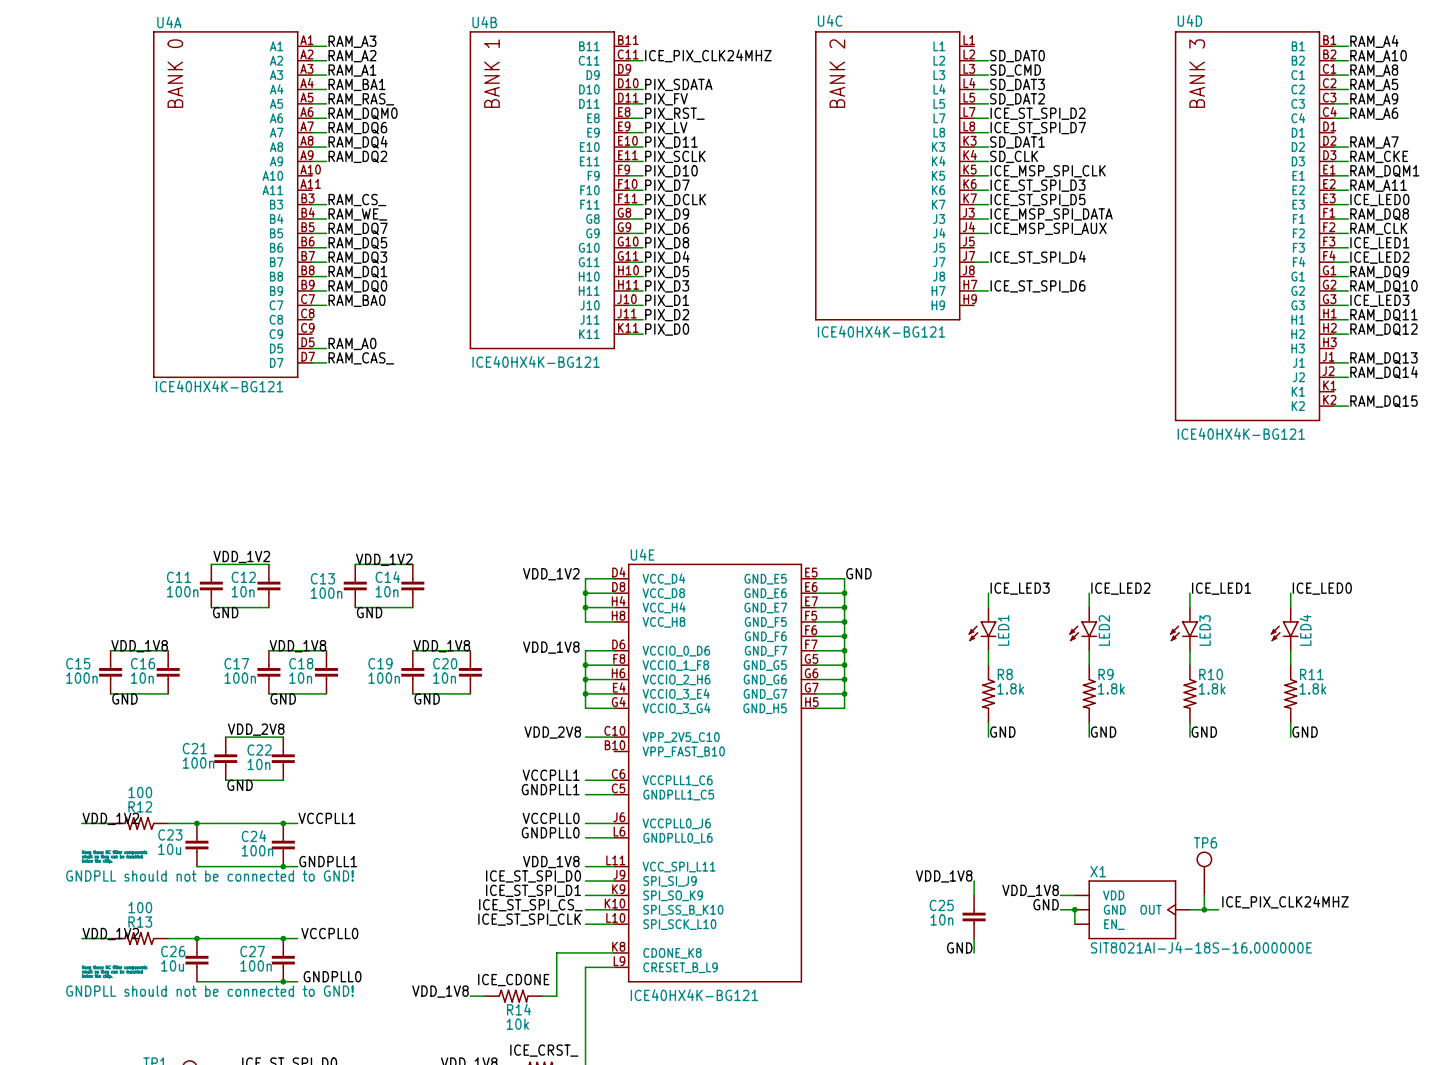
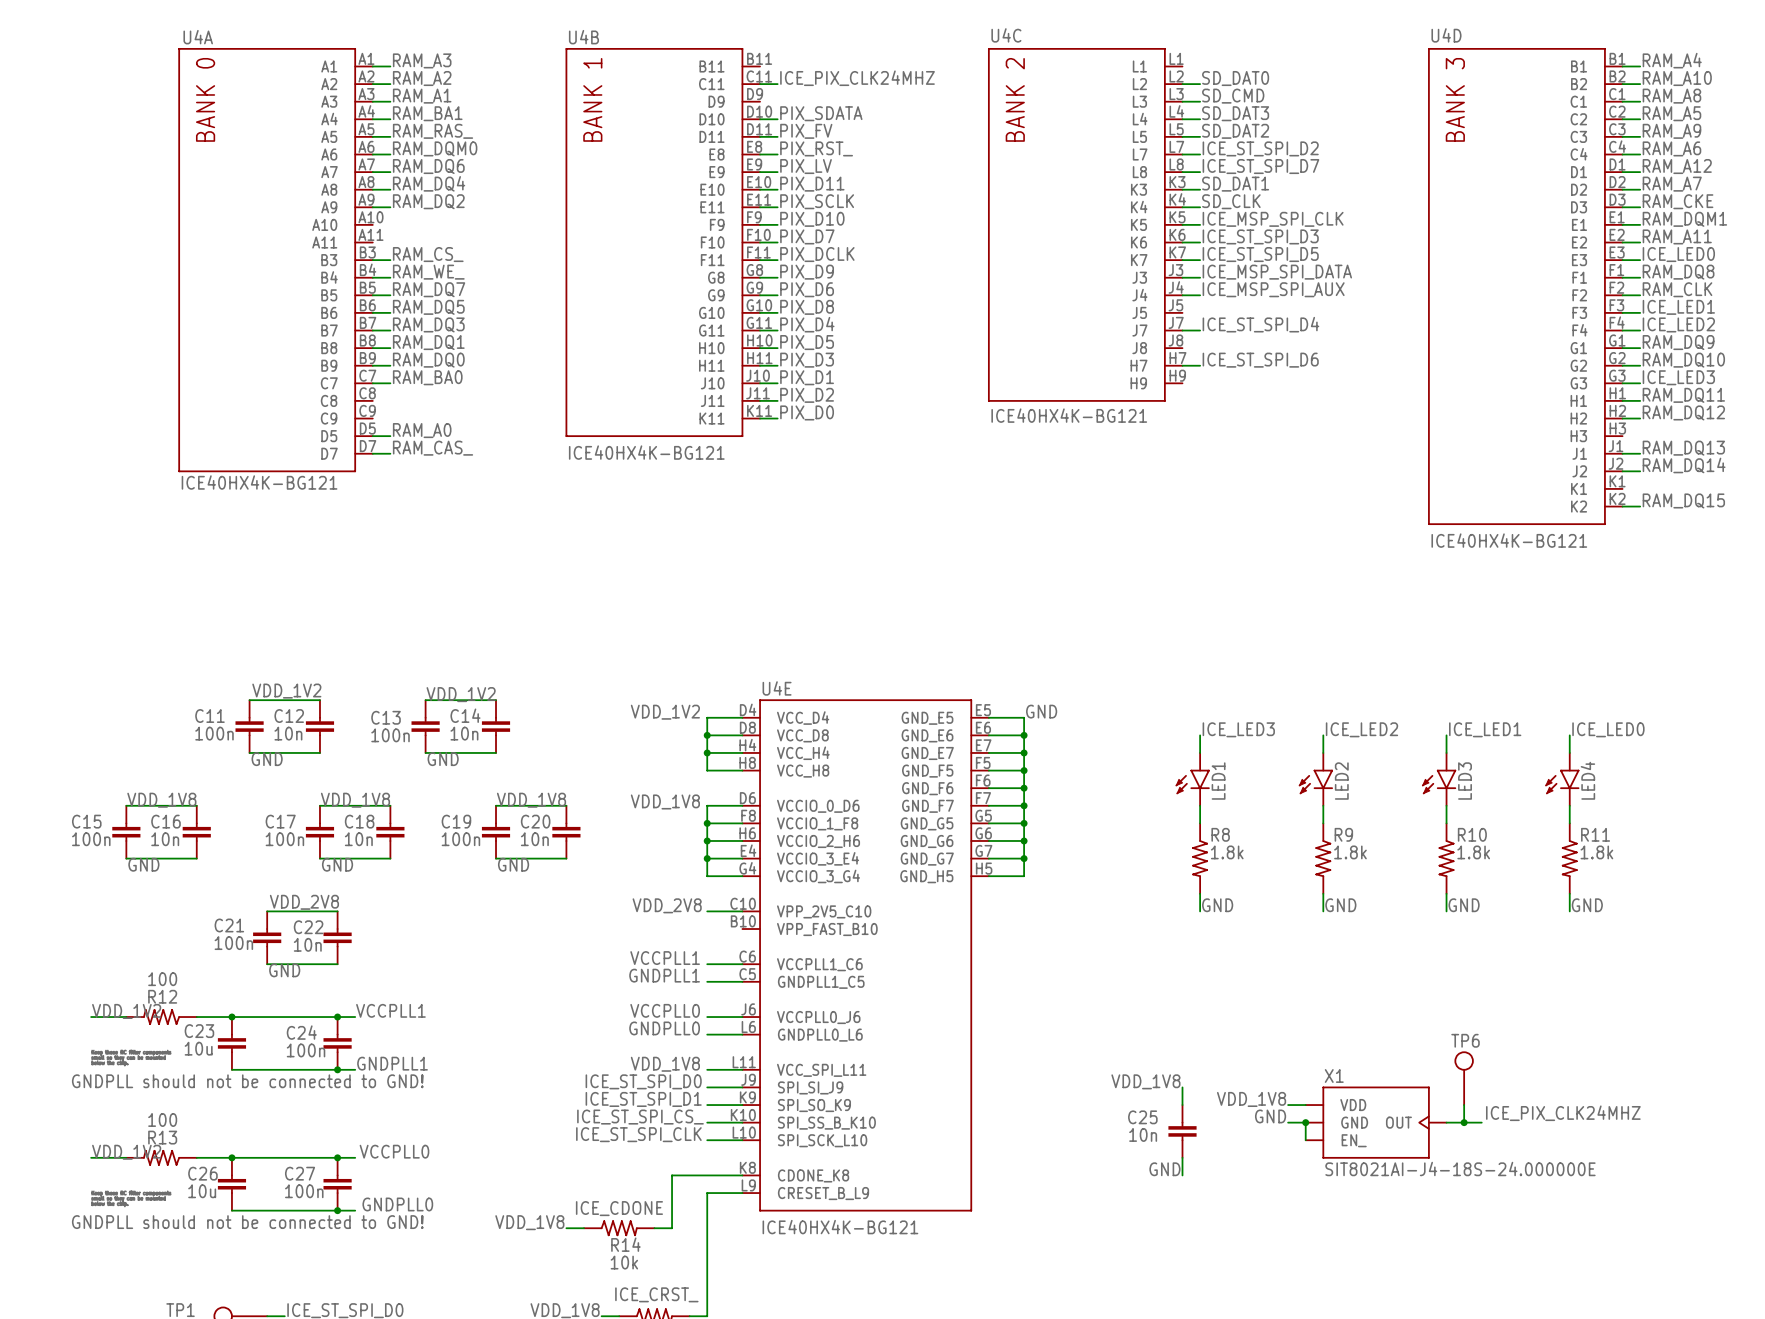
label: none -> RAM_A12 (1677, 166)
wire: none -> (1622, 172) (1640, 172)
X1 text: SIT8021AI-J4-18S-16.000000E (1201, 947) -> SIT8021AI-J4-18S-24.000000E (1460, 1168)

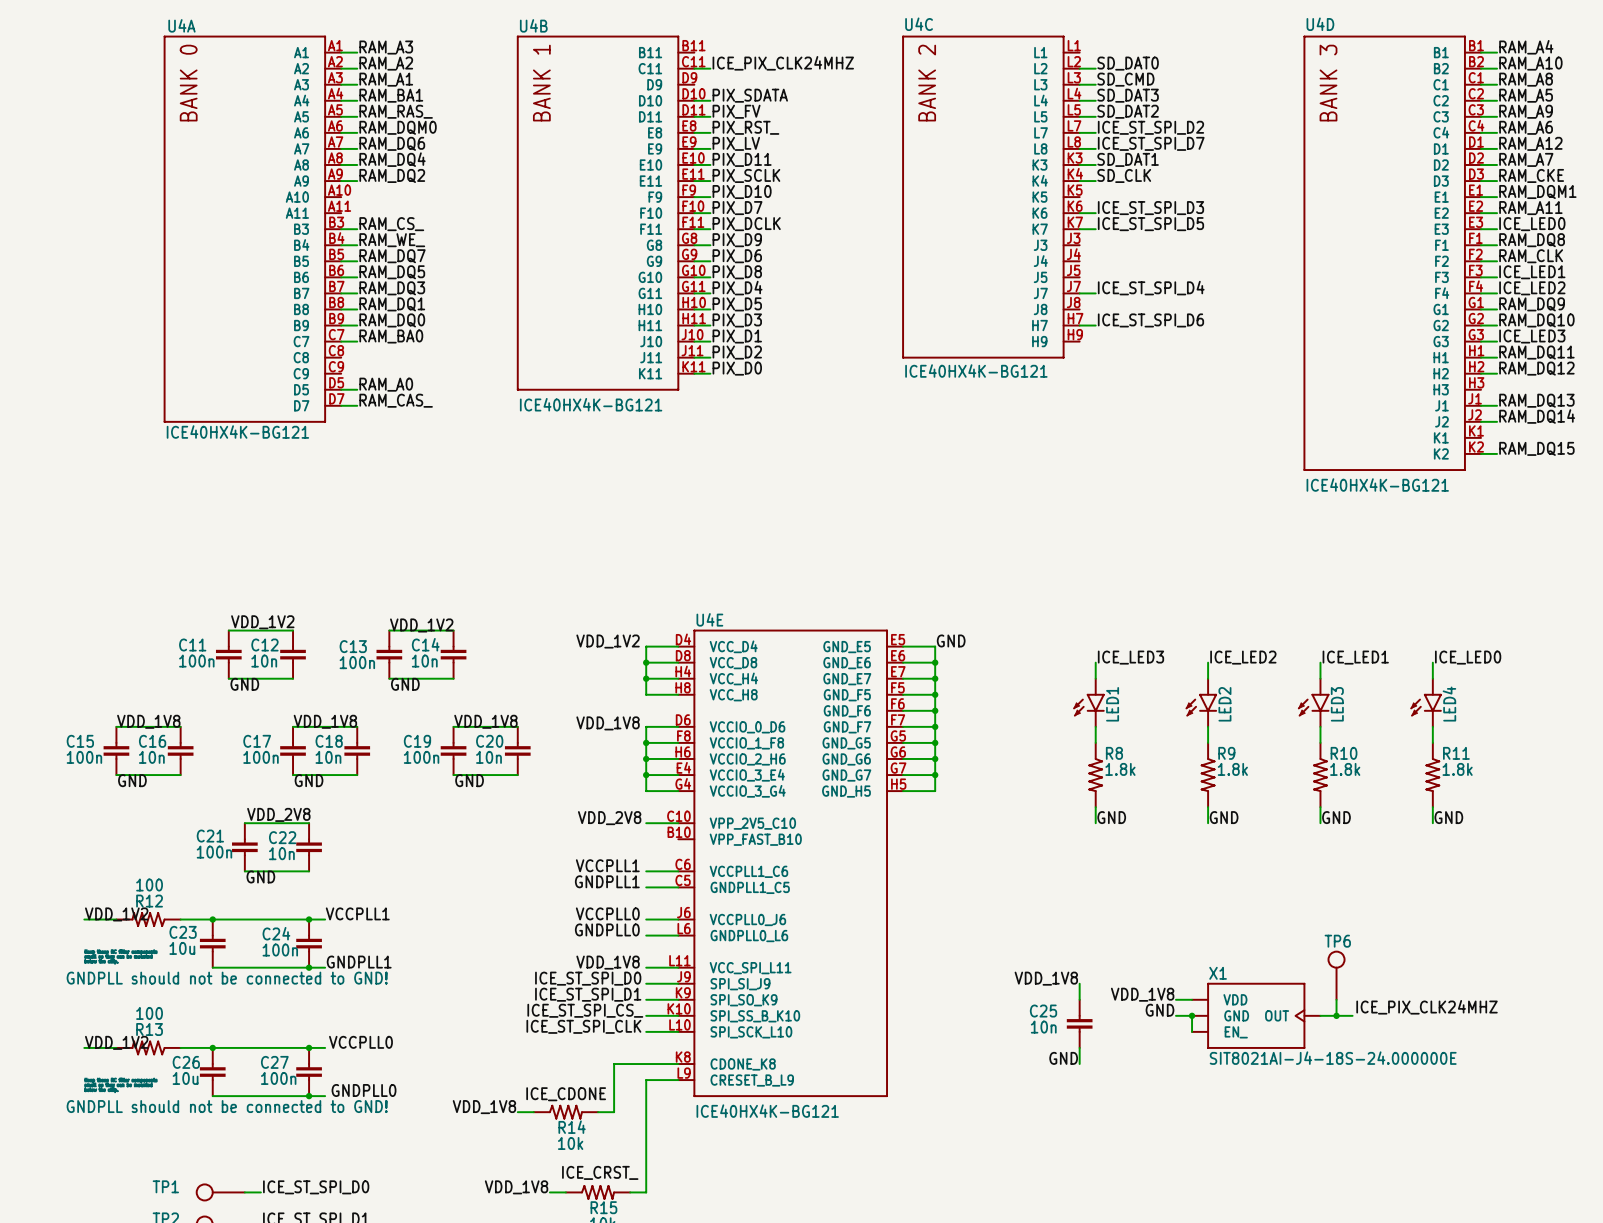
label: ICE_MSP_SPI_CLK (1273, 219) -> none
wire: (1182, 224) (1200, 224) -> none
label: ICE_MSP_SPI_DATA (1277, 272) -> none
wire: (1182, 277) (1200, 277) -> none
label: ICE_MSP_SPI_AUX (1273, 289) -> none
wire: (1182, 295) (1200, 295) -> none

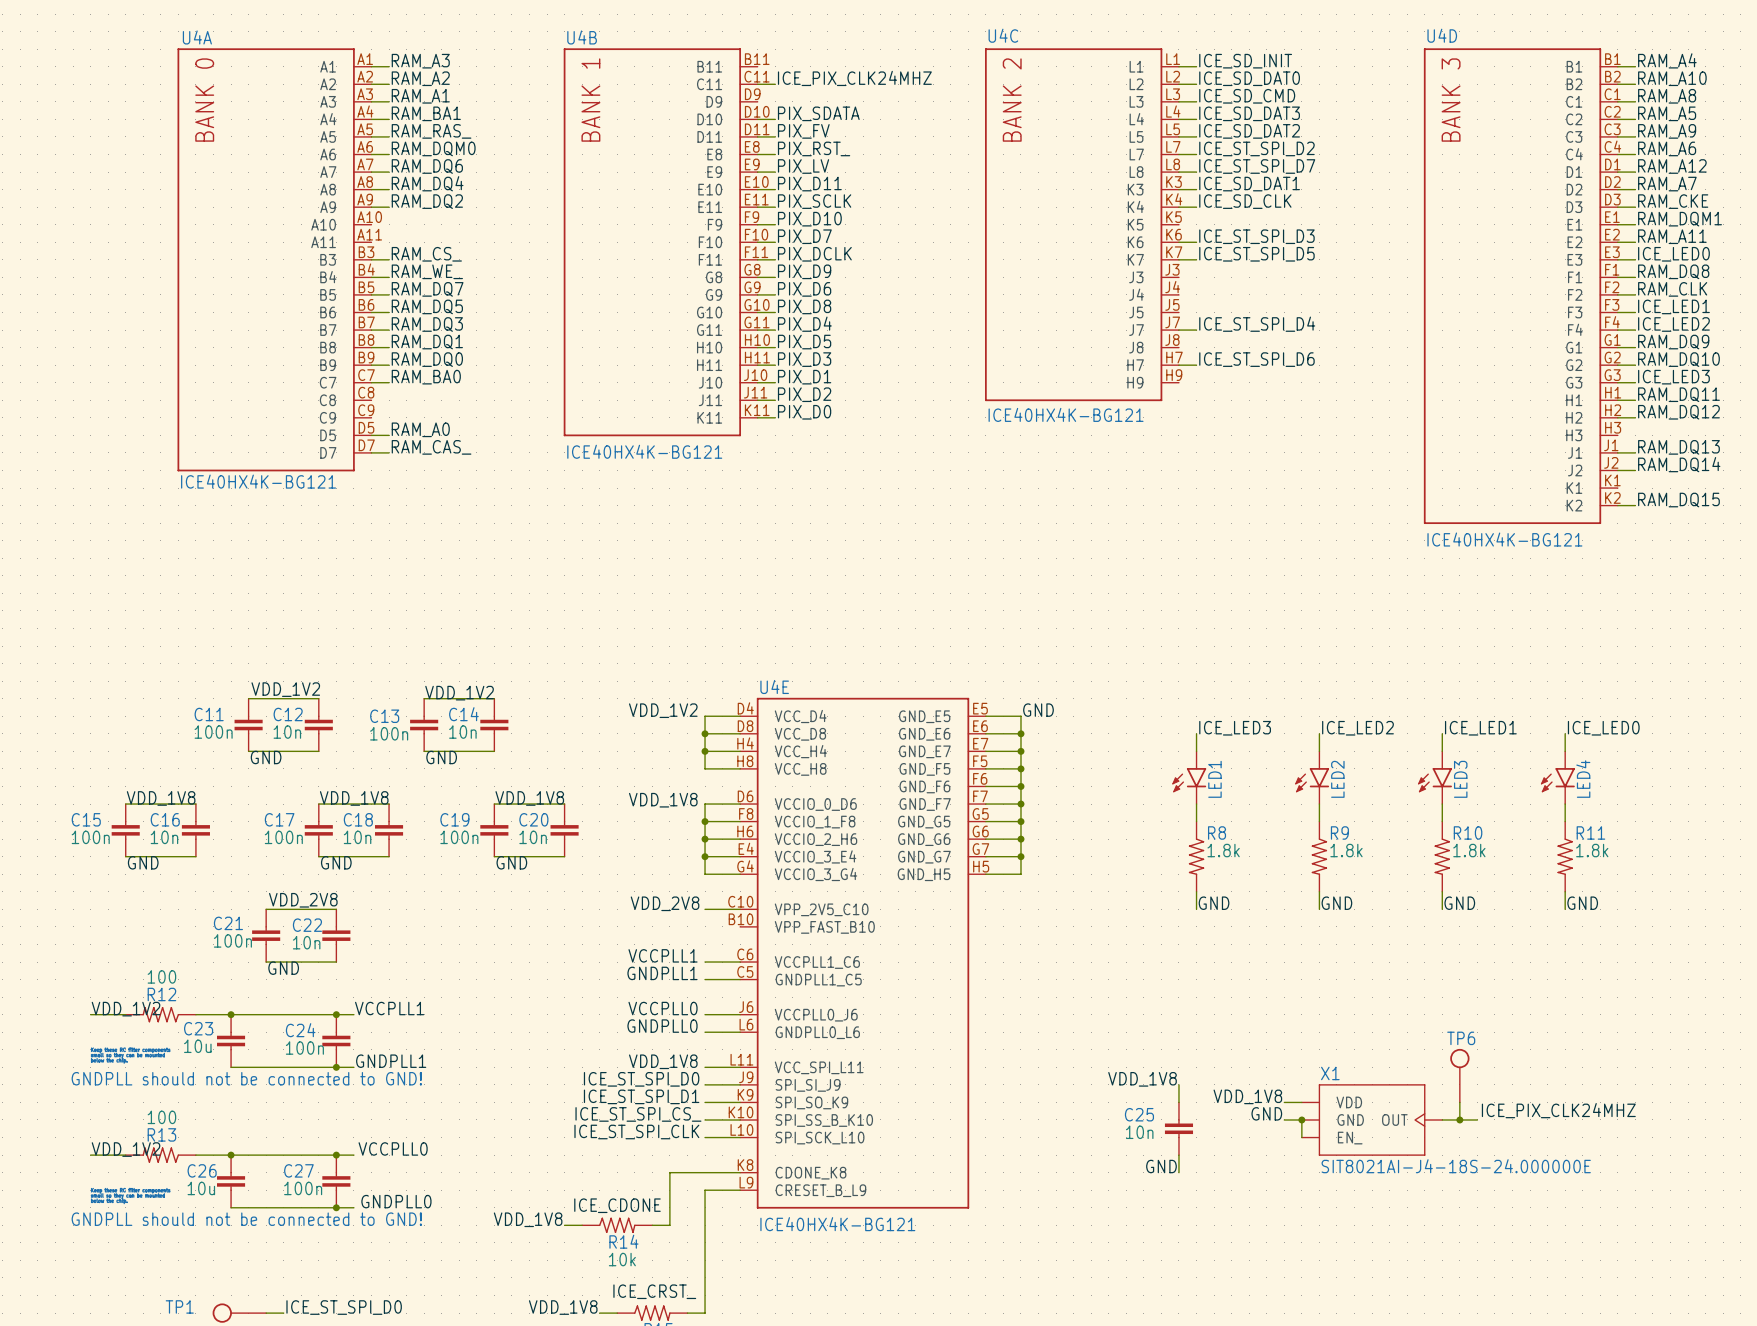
label: none -> ICE_SD_INIT (1245, 61)
wire: none -> (1178, 66) (1196, 66)
label: SD_DAT0 (1128, 63) -> ICE_SD_DAT0 (1249, 78)
label: SD_CMD (1125, 79) -> ICE_SD_CMD (1247, 96)
label: SD_DAT3 (1128, 95) -> ICE_SD_DAT3 (1249, 113)
label: SD_DAT2 (1128, 111) -> ICE_SD_DAT2 (1249, 131)
label: SD_DAT1 (1128, 159) -> ICE_SD_DAT1 (1249, 184)
label: SD_CLK (1124, 175) -> ICE_SD_CLK (1245, 201)

